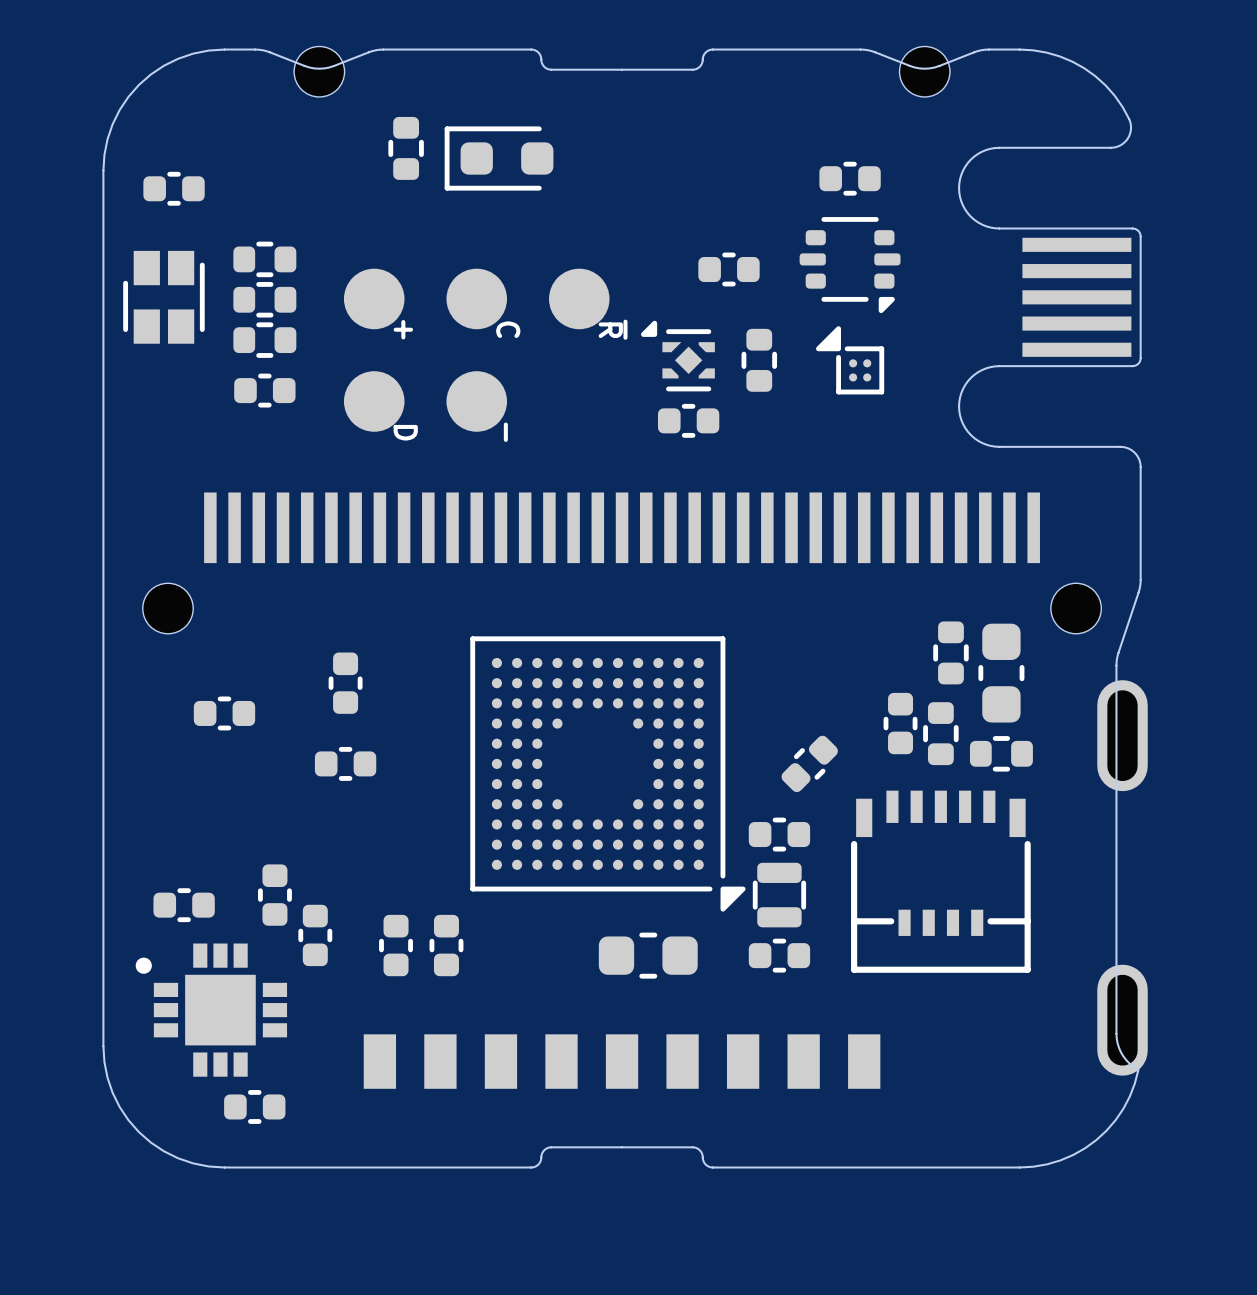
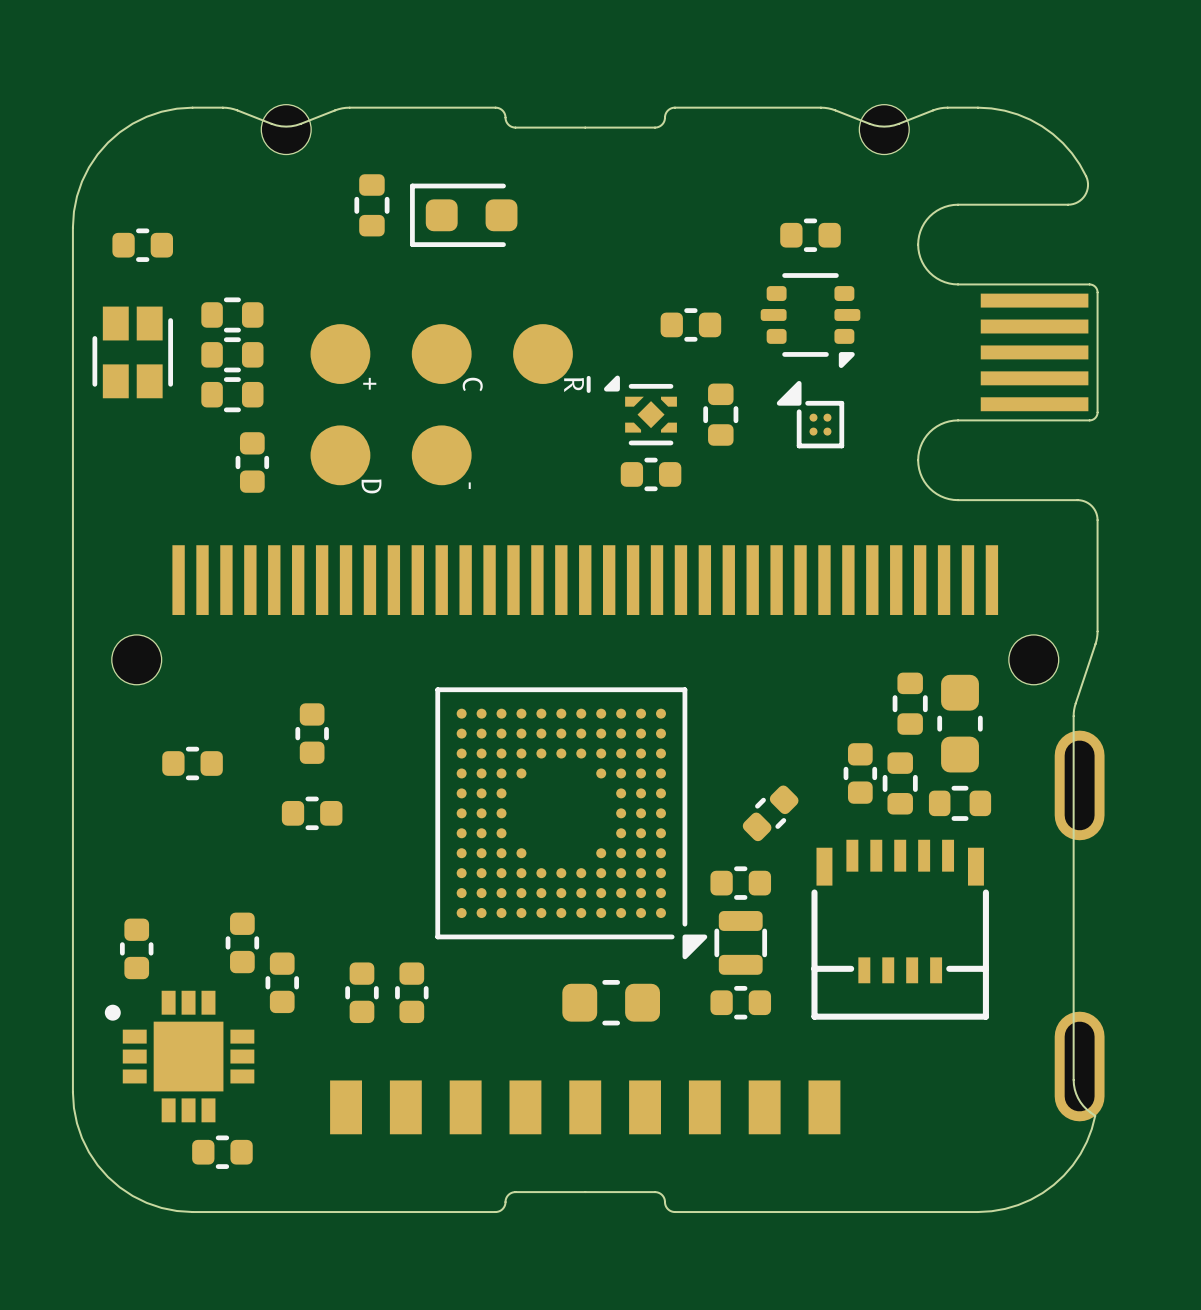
part rotation: 0° (264, 390) -> 90° clockwise (252, 462)
part rotation: 0° (184, 905) -> 90° clockwise (136, 948)

